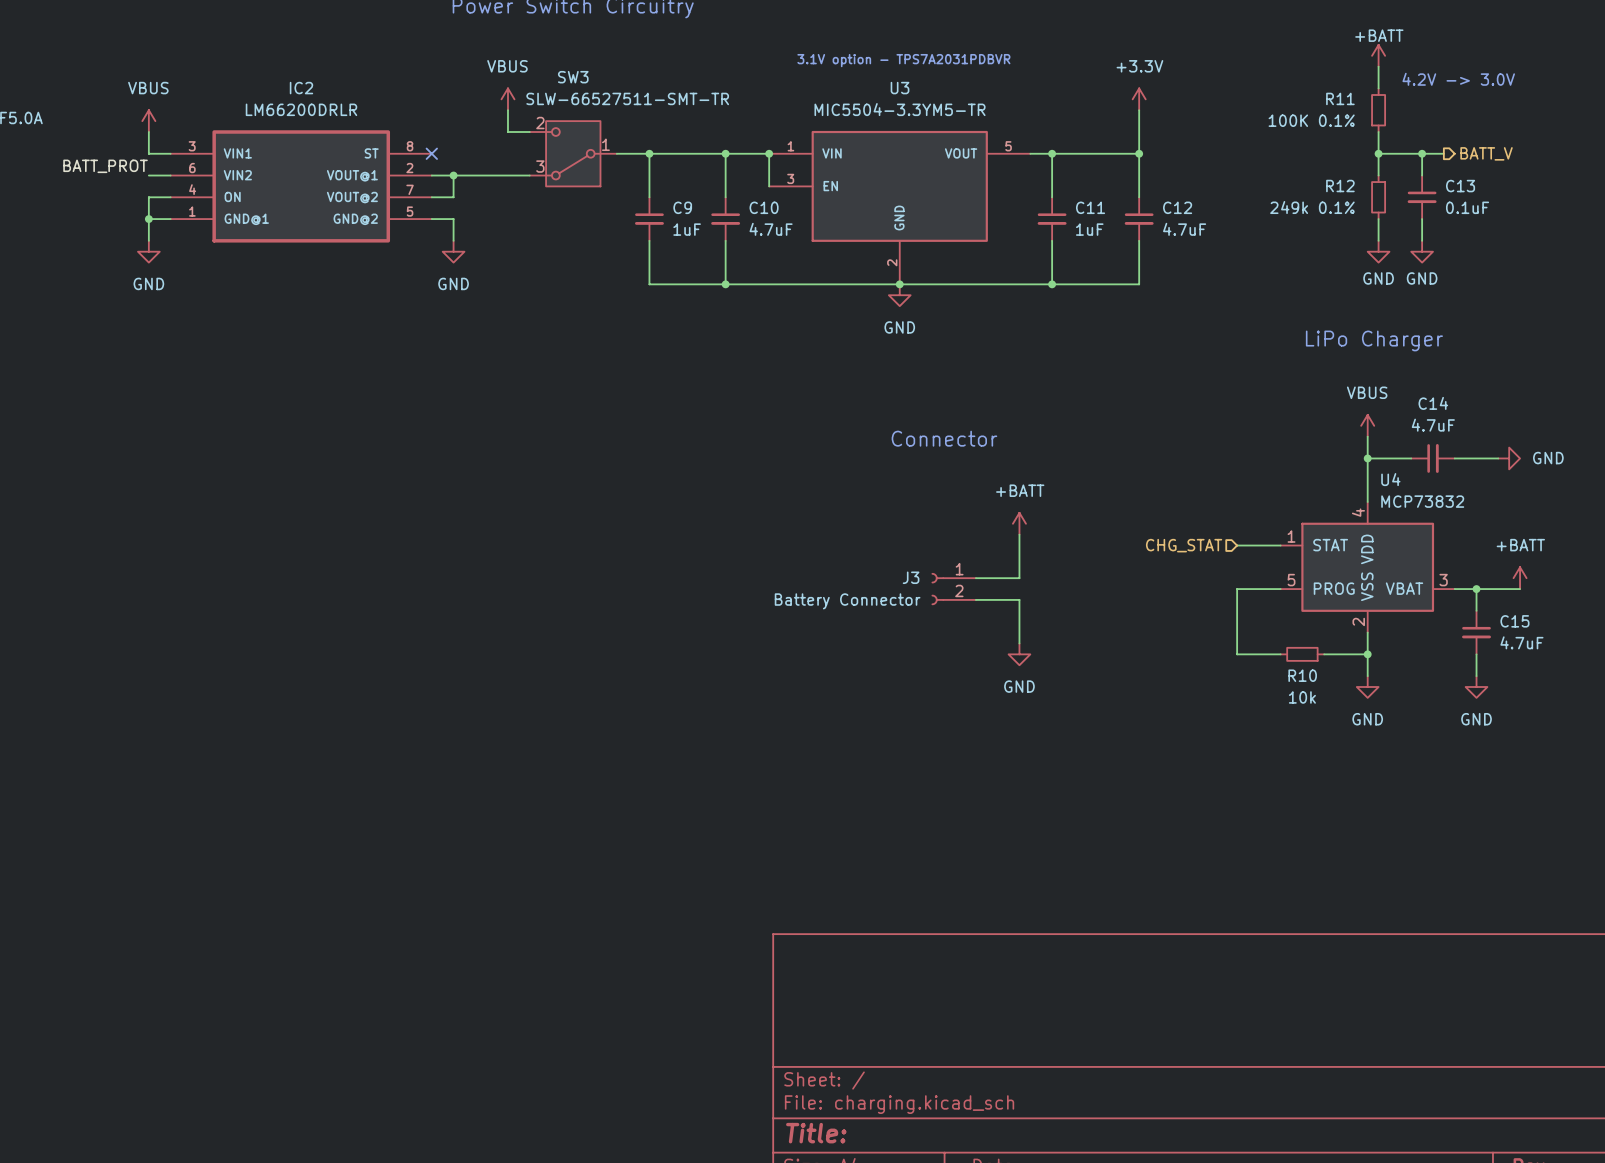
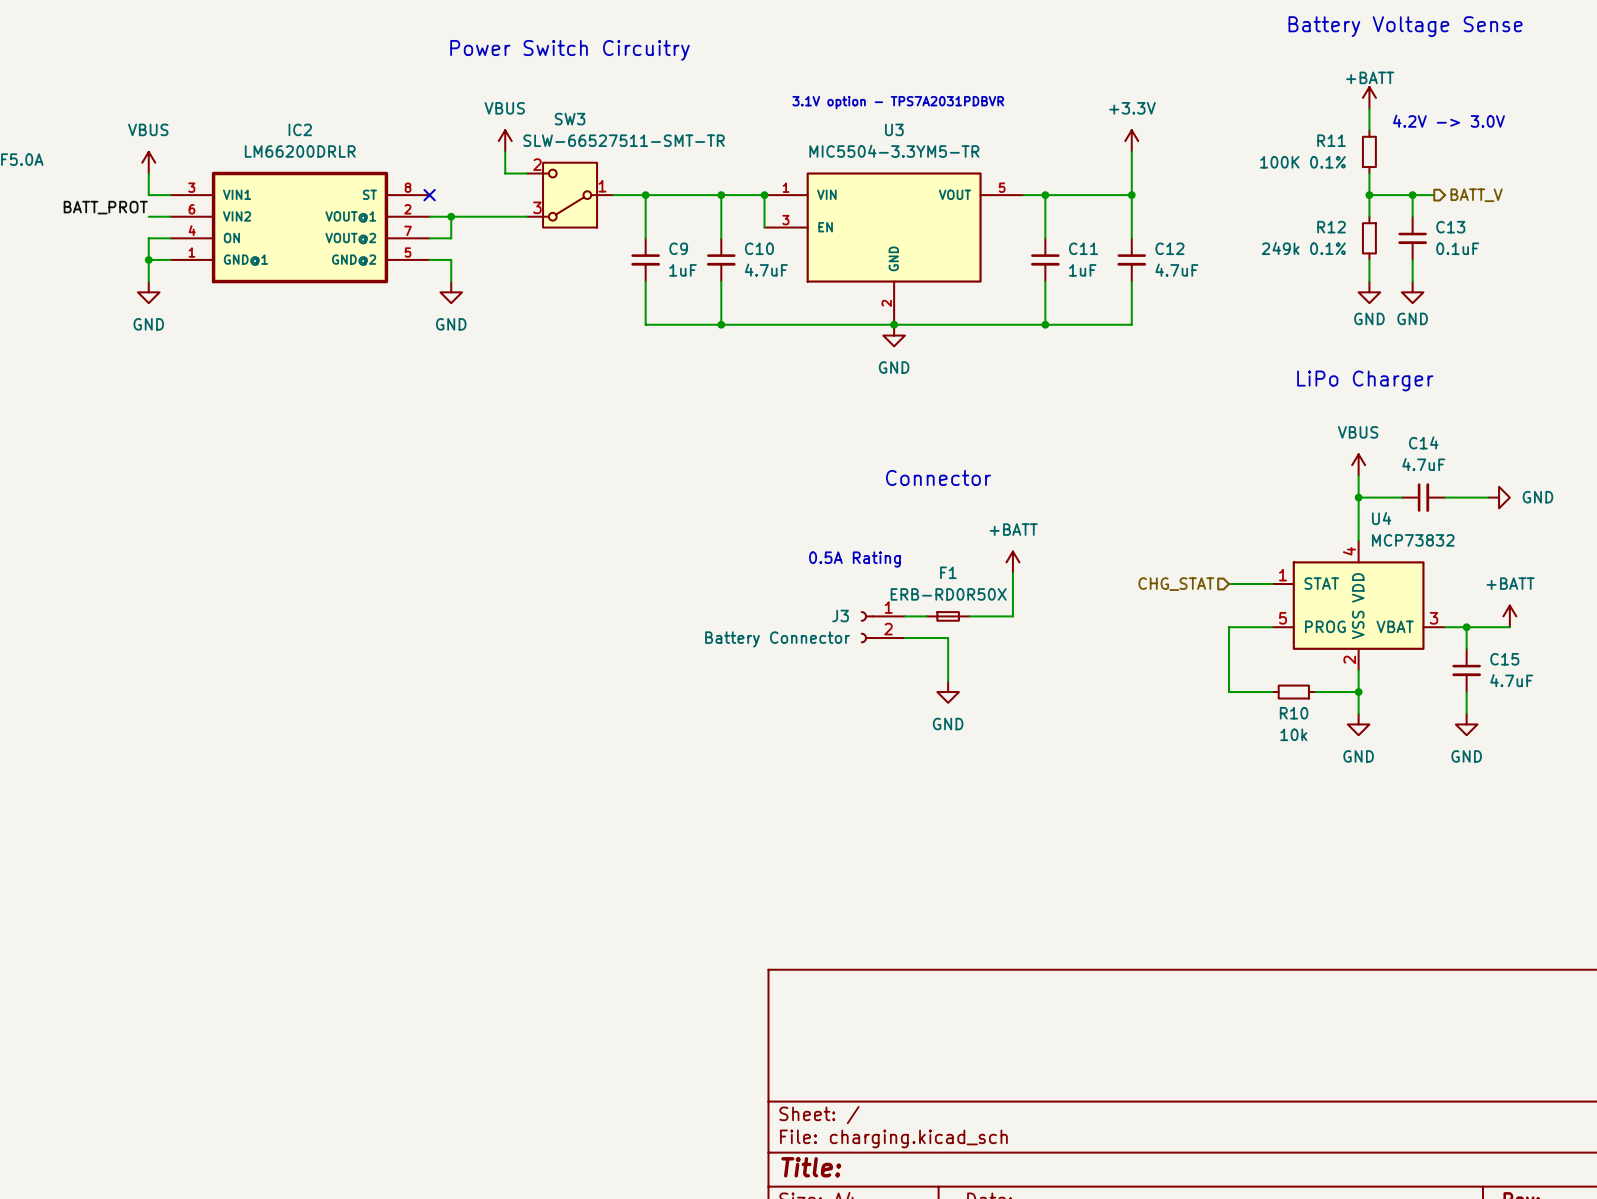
text: none -> 0.5A Rating (854, 559)
wire: none -> (904, 616) (926, 616)
F1: none -> ERB-RD0R50X (948, 616)
J3 position: (953, 589) -> (882, 627)
wire: (975, 599) (1019, 599) (1019, 643) -> (904, 638) (948, 638) (948, 681)
power symbol position: GND (1019, 654) -> GND (948, 692)

